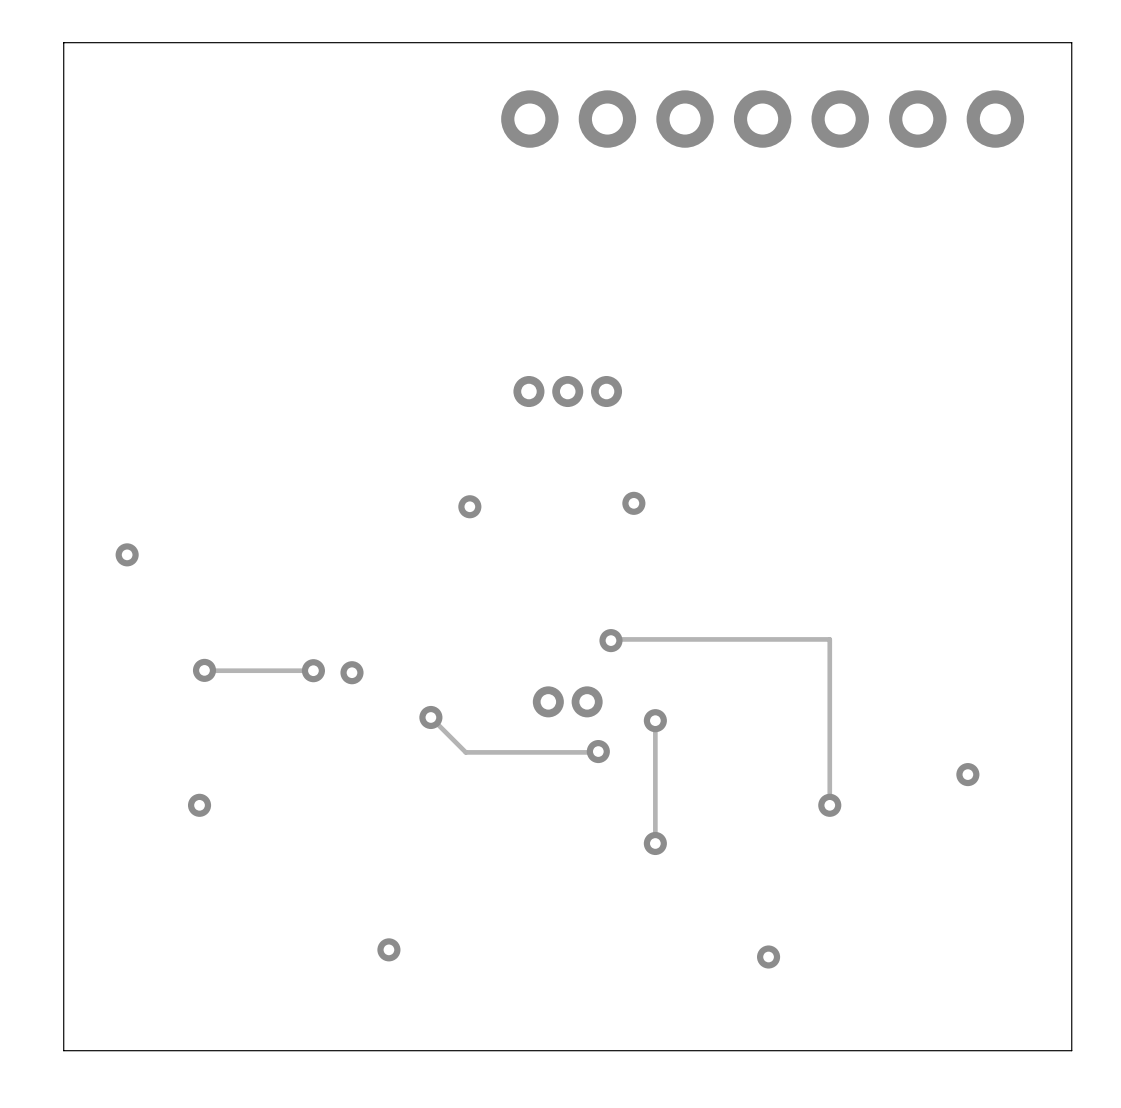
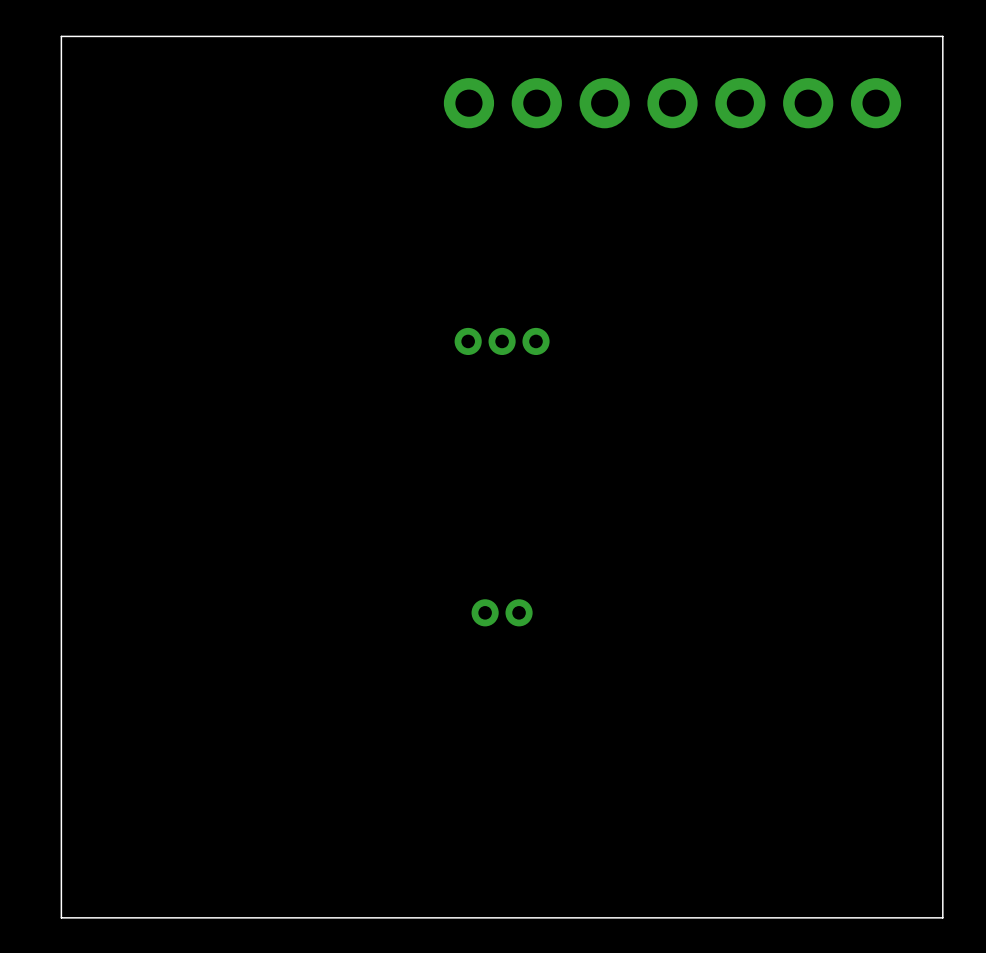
via: (633, 503) -> none
via: (469, 506) -> none
via: (127, 554) -> none
track: (610, 640) (829, 639) (829, 805) -> none
via: (610, 640) -> none
via: (204, 670) -> none
track: (313, 670) (204, 670) -> none
via: (313, 670) -> none
via: (351, 672) -> none
track: (430, 717) (465, 752) (598, 751) -> none
via: (430, 717) -> none
track: (655, 720) (655, 843) -> none
via: (655, 720) -> none
via: (598, 751) -> none
via: (967, 774) -> none
via: (199, 805) -> none
via: (829, 805) -> none
via: (655, 843) -> none
via: (388, 949) -> none
via: (768, 956) -> none

